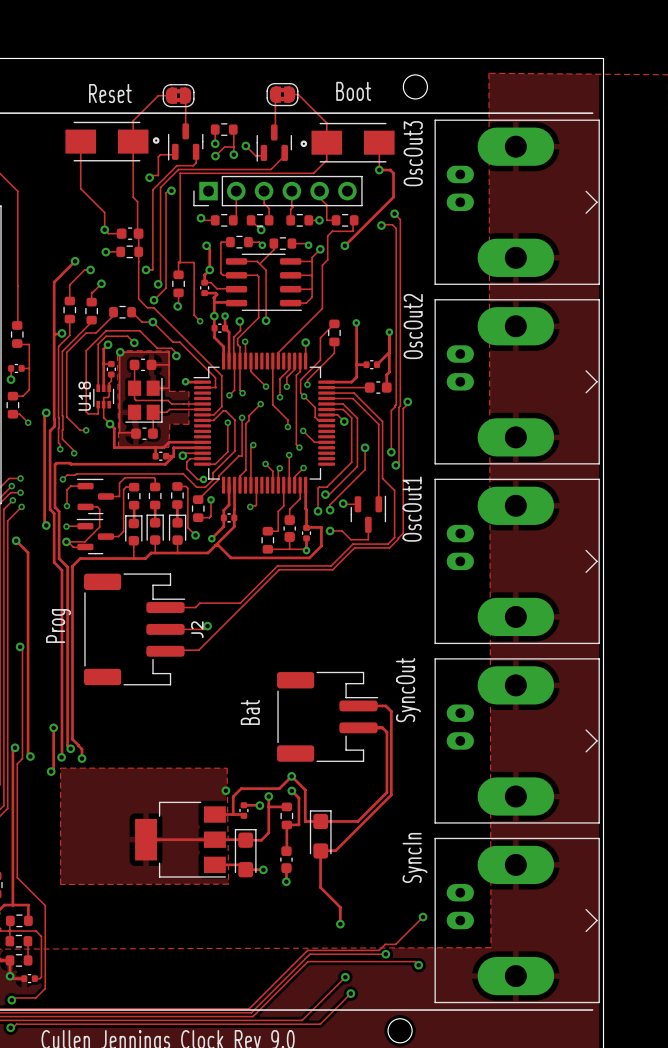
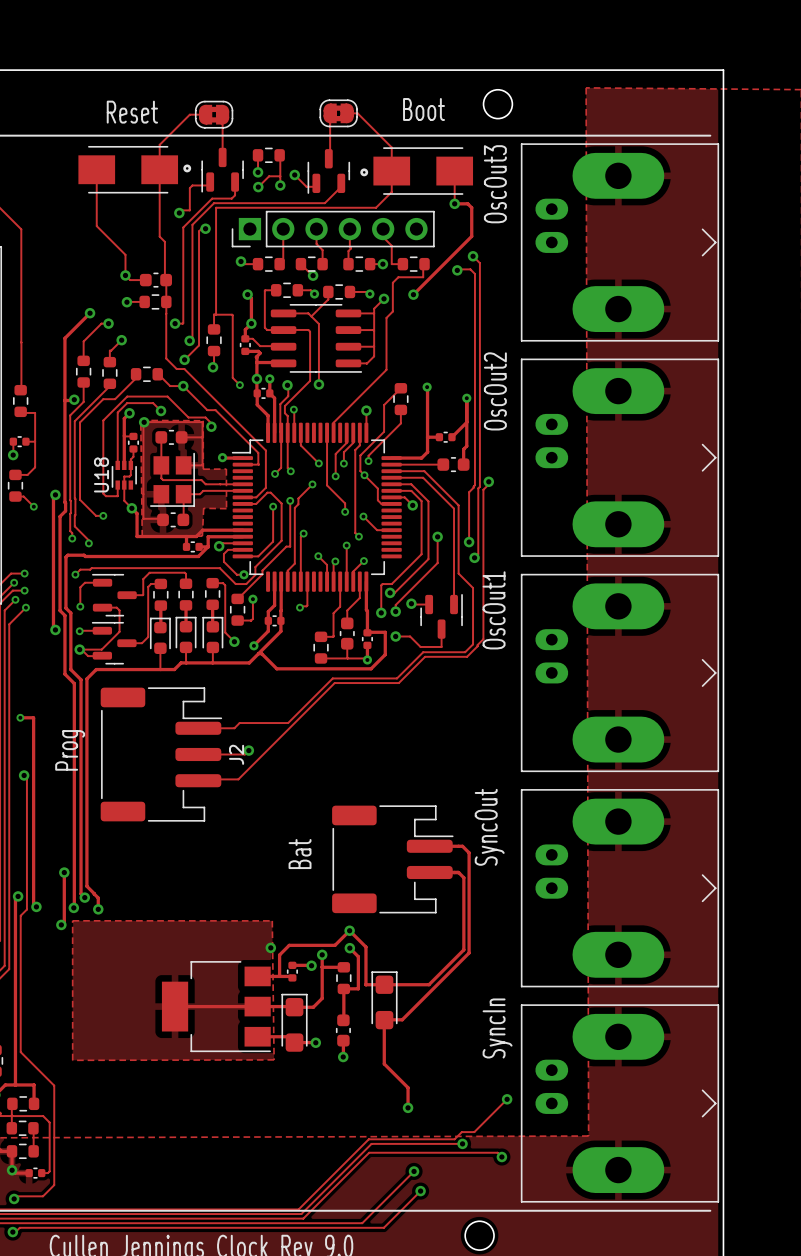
track: (16, 540) (28, 552) (28, 599) -> (20, 717) (33, 718)
via: (16, 540) -> none
via: none -> (20, 717)

